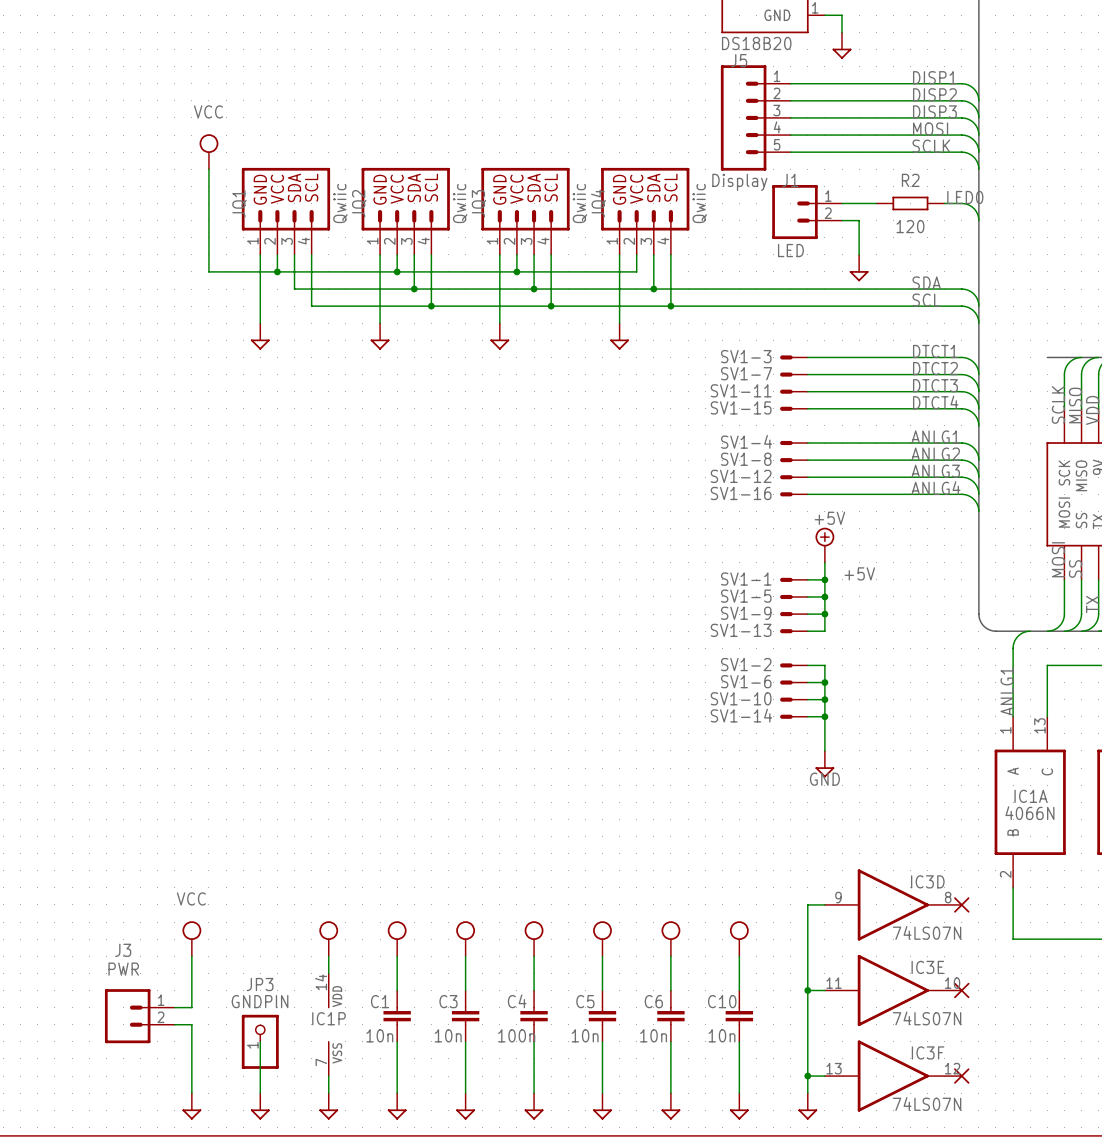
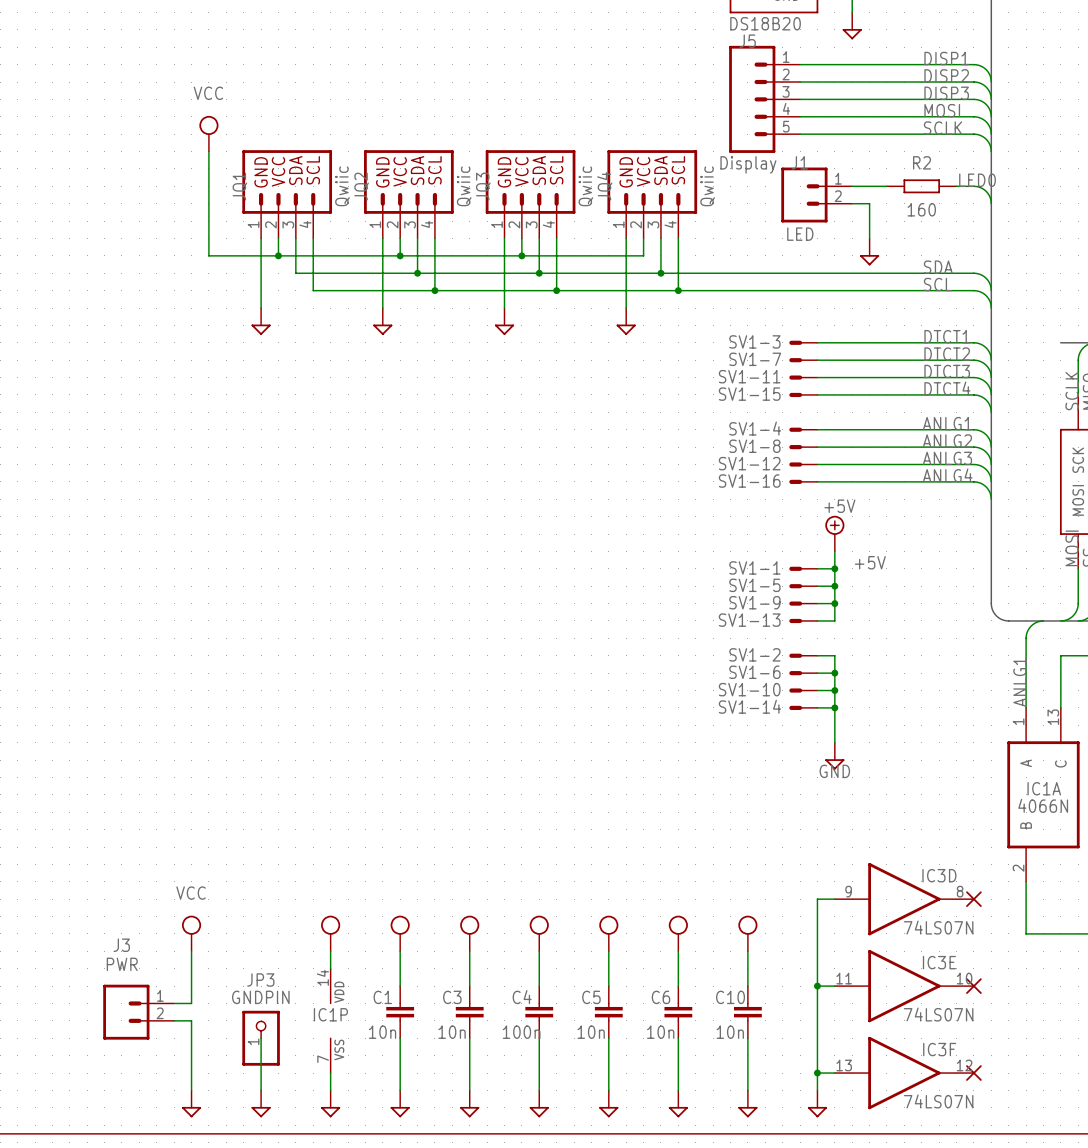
R2 value: 120 (910, 226) -> 160 (921, 209)

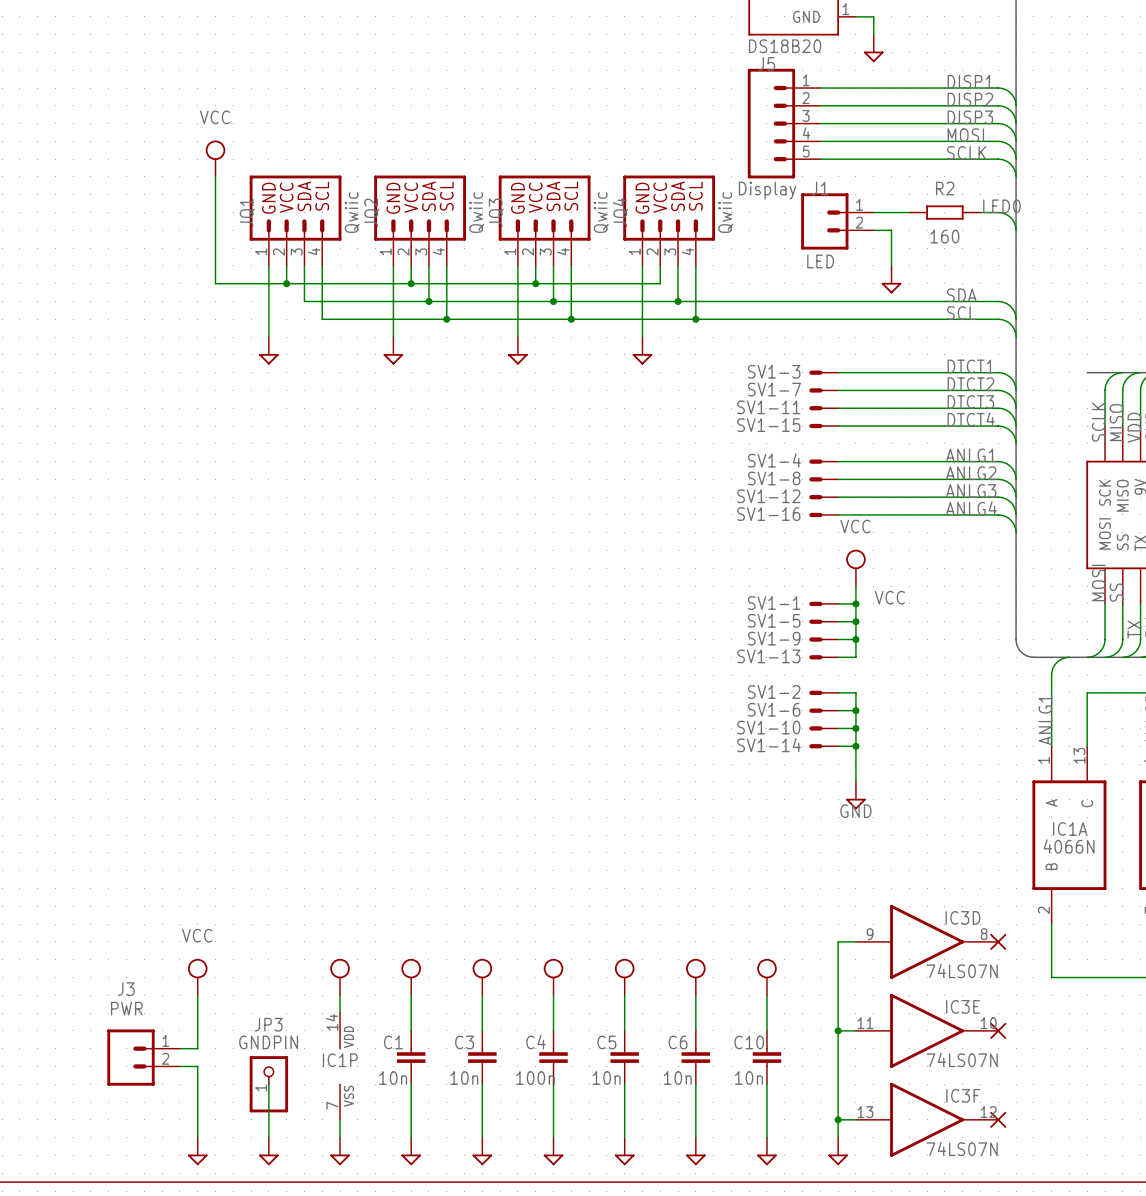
power symbol: +5V (834, 533) -> VCC (855, 567)
label: +5V (870, 562) -> VCC (889, 597)

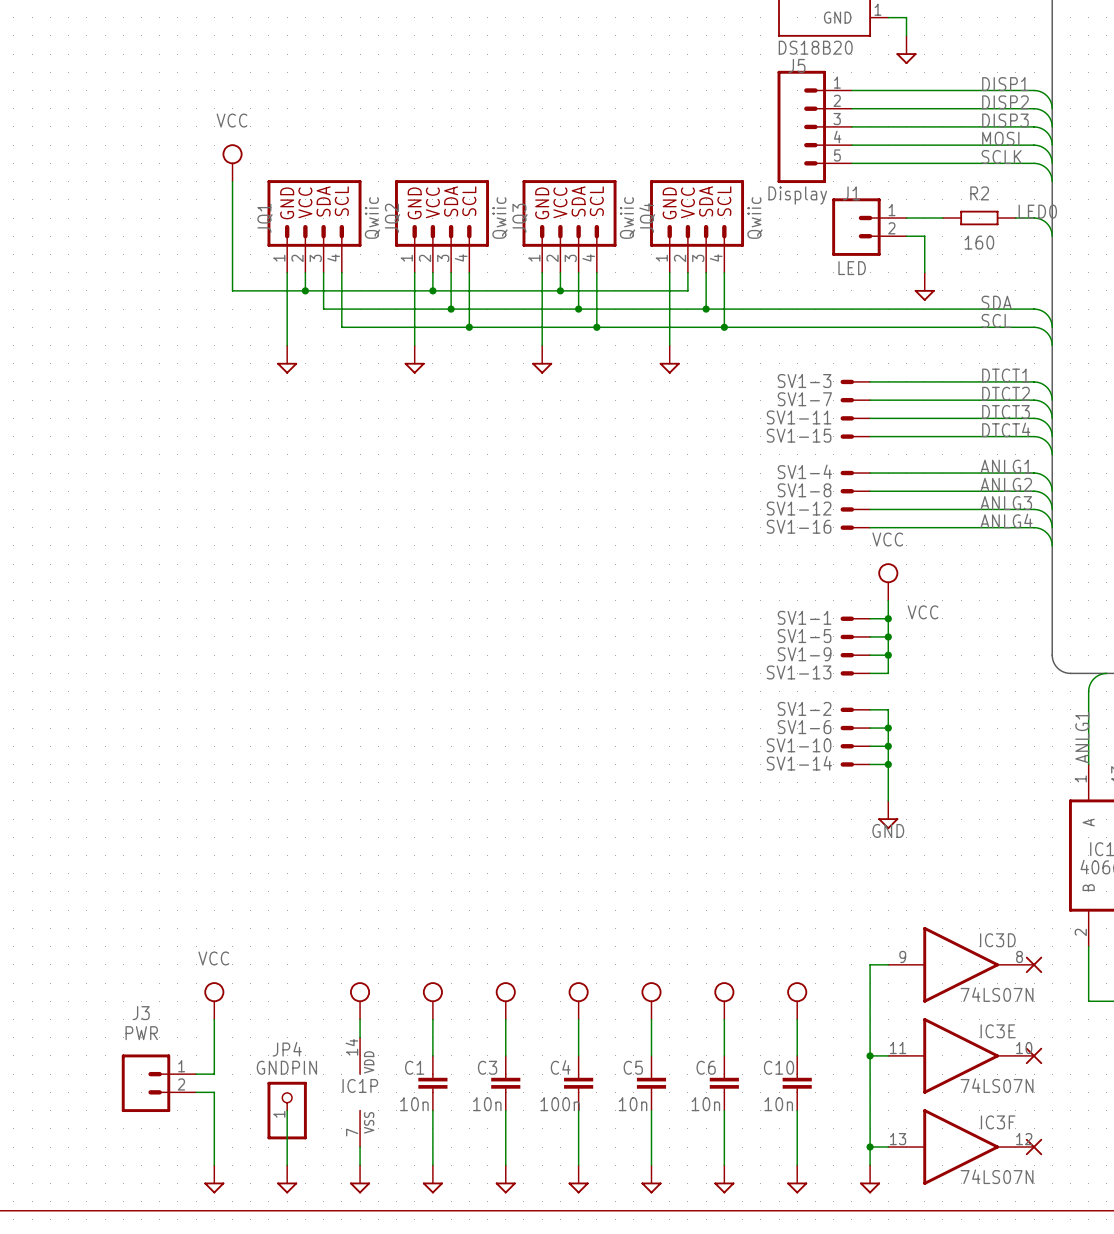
JP3 name: JP3 (268, 1024) -> JP4 (287, 1049)

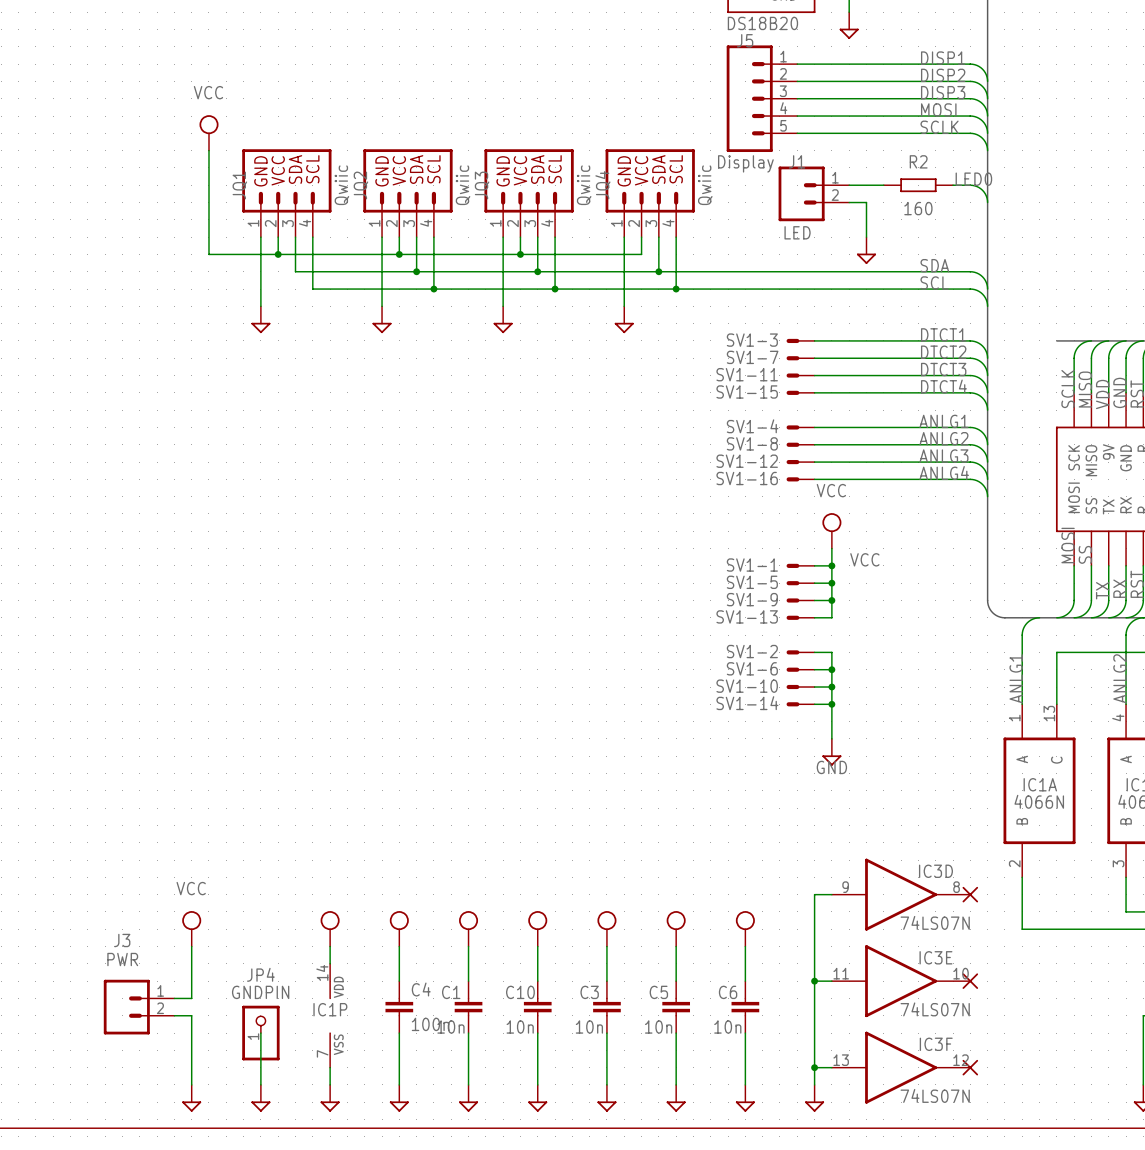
C1 name: C1 (414, 1067) -> C4 (421, 989)
C3 name: C3 (487, 1067) -> C1 (451, 992)
C4 name: C4 (560, 1067) -> C10 (520, 992)
C5 name: C5 (633, 1067) -> C3 (589, 992)
C6 name: C6 (706, 1067) -> C5 (658, 992)
C10 name: C10 (779, 1067) -> C6 (728, 992)
C1 value: 10n (414, 1104) -> 100n (430, 1024)
C4 value: 100n (560, 1104) -> 10n (520, 1027)

